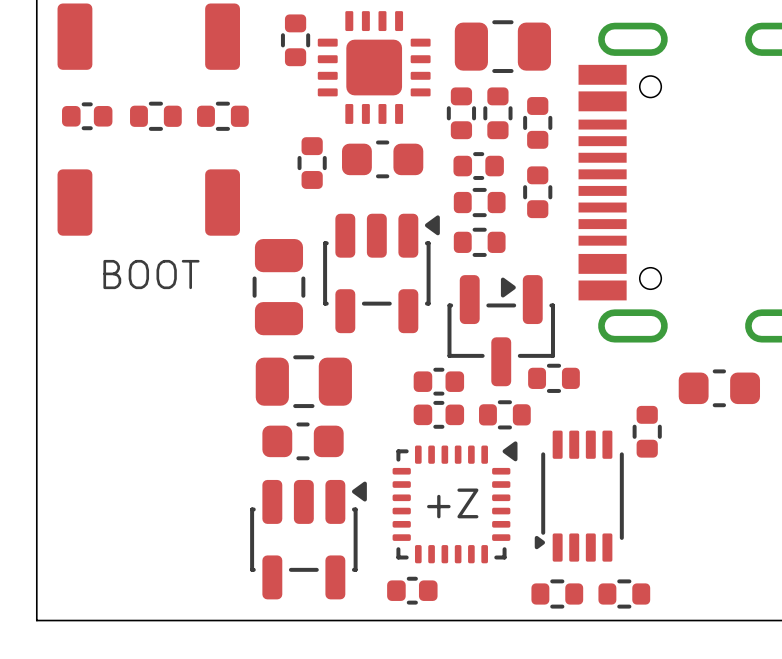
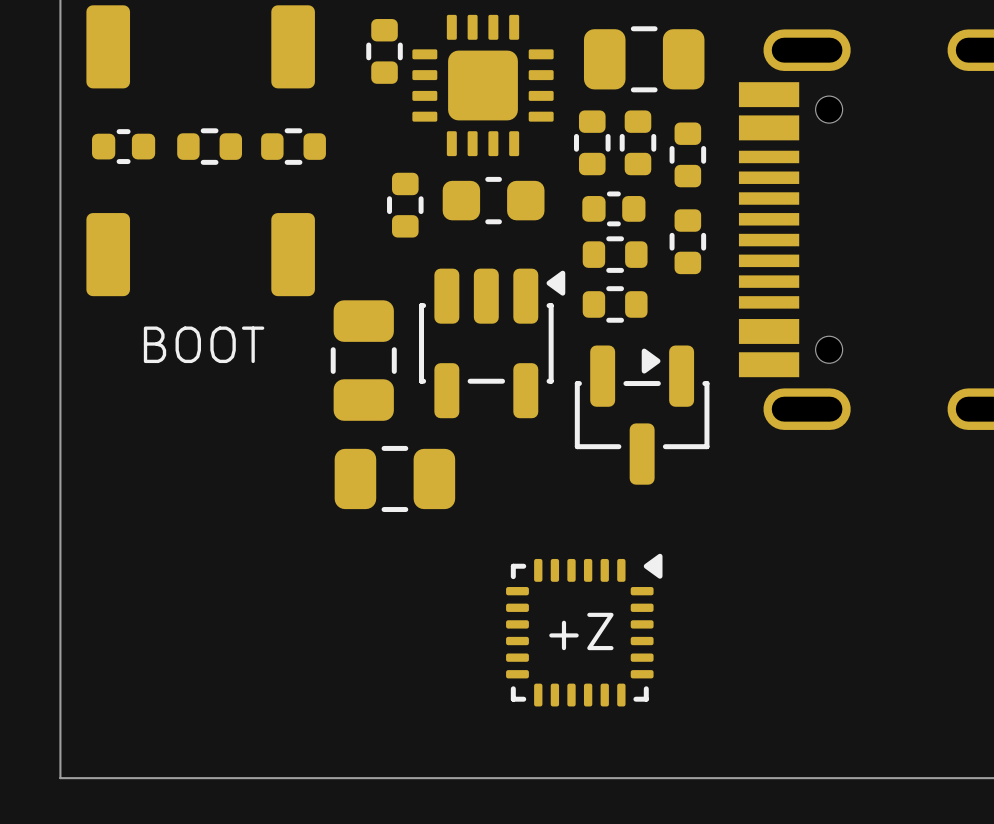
part: (553, 378) -> none
part: (438, 381) -> none
part: (719, 388) -> none
part: (438, 414) -> none
part: (504, 414) -> none
part: (647, 431) -> none
part: (303, 441) -> none
part: (579, 496) -> none
part: (308, 539) -> none
part: (412, 590) -> none
part: (557, 593) -> none
part: (624, 593) -> none

